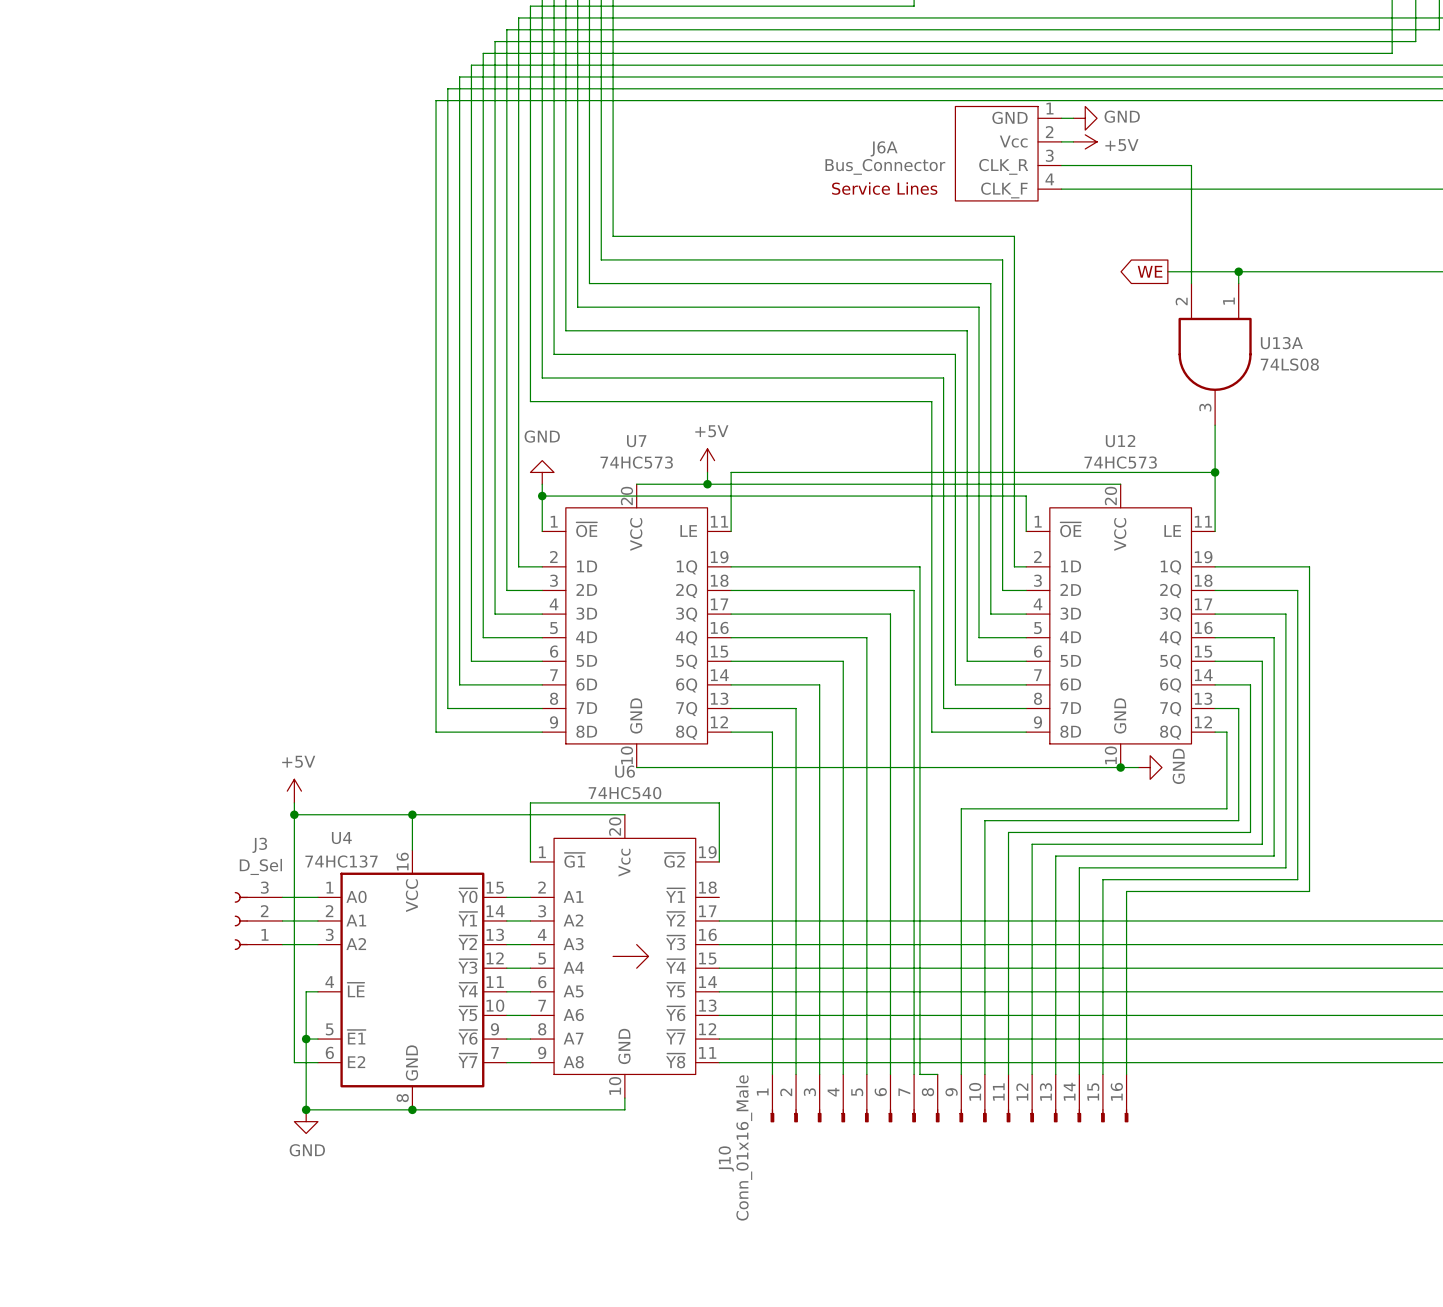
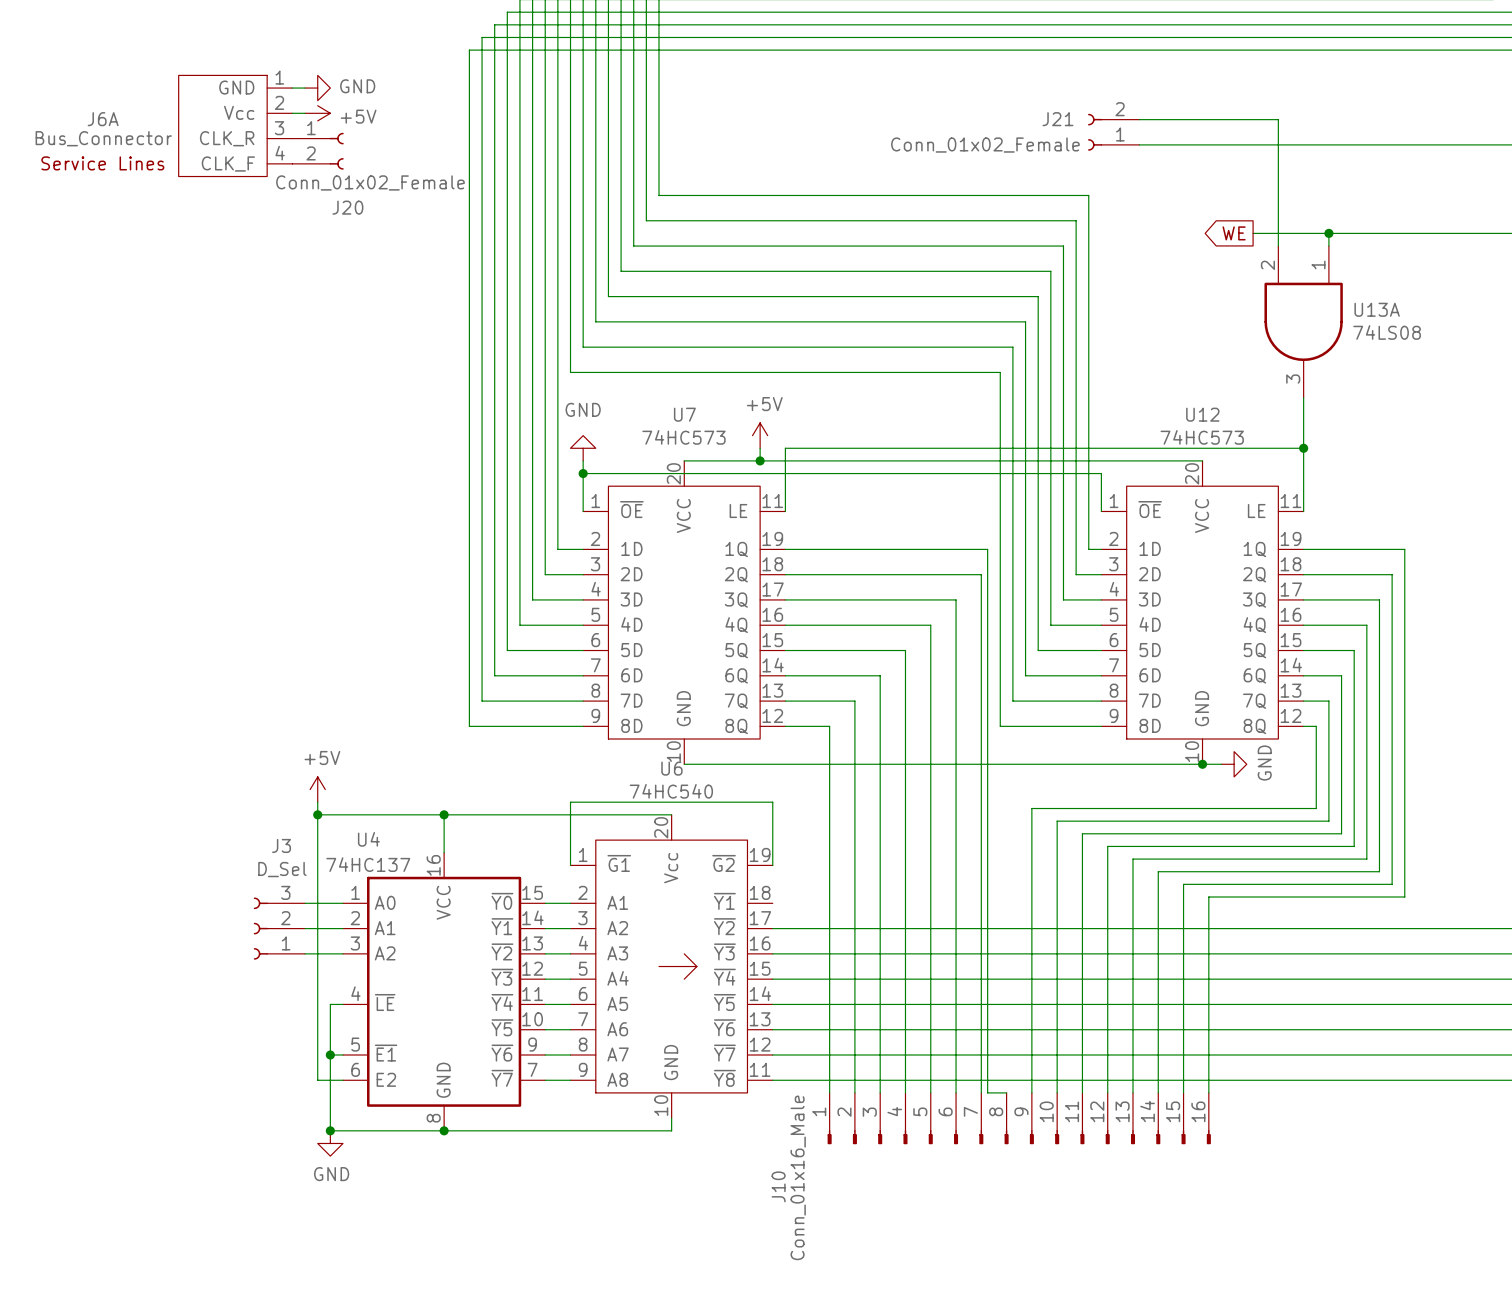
wire: (1061, 118) (1073, 118) -> none
power symbol: GND (1085, 118) -> none
wire: none -> (292, 88) (305, 88)
power symbol: none -> GND (317, 88)
wire: (1061, 141) (1073, 141) -> none
power symbol: +5V (1085, 141) -> none
J6A position: (1008, 153) -> (235, 125)
wire: none -> (292, 113) (305, 113)
power symbol: none -> +5V (317, 113)
J21: none -> Conn_01x02_Female (1113, 132)
J20: none -> Conn_01x02_Female (318, 151)

